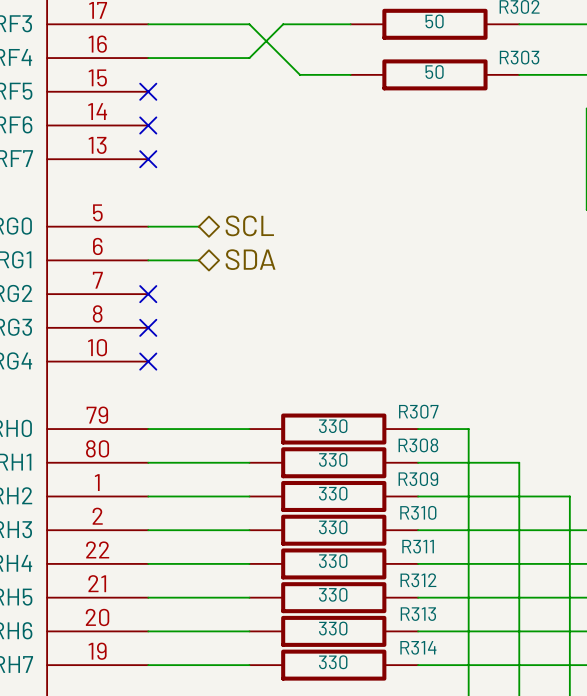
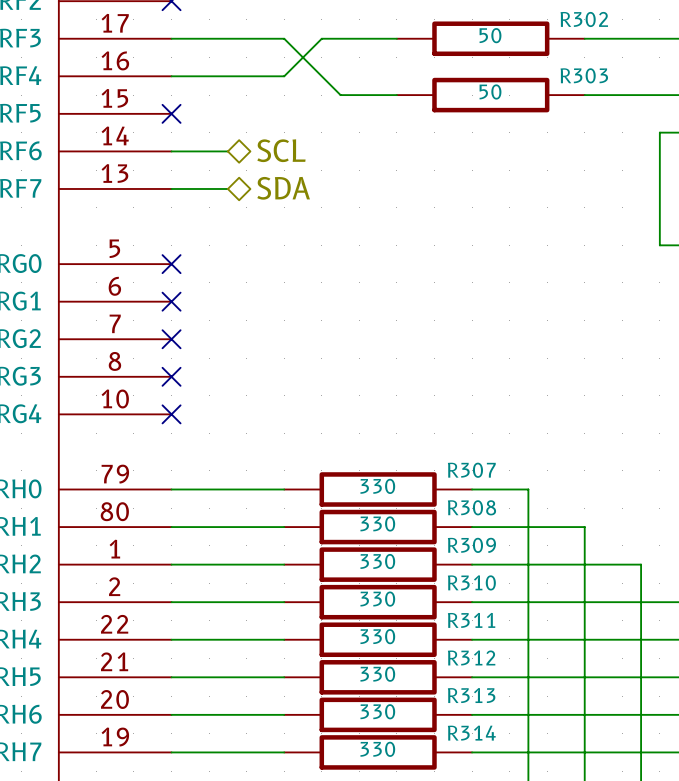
no-connect mark: (148, 125) -> none
no-connect mark: (148, 159) -> none
hierarchical label position: SCL (249, 225) -> SCL (281, 150)
wire: (148, 226) (198, 226) -> (171, 188) (227, 188)
no-connect mark: none -> (171, 264)
hierarchical label position: SDA (250, 259) -> SDA (283, 188)
wire: (148, 260) (198, 260) -> (171, 151) (227, 151)
no-connect mark: none -> (171, 301)

